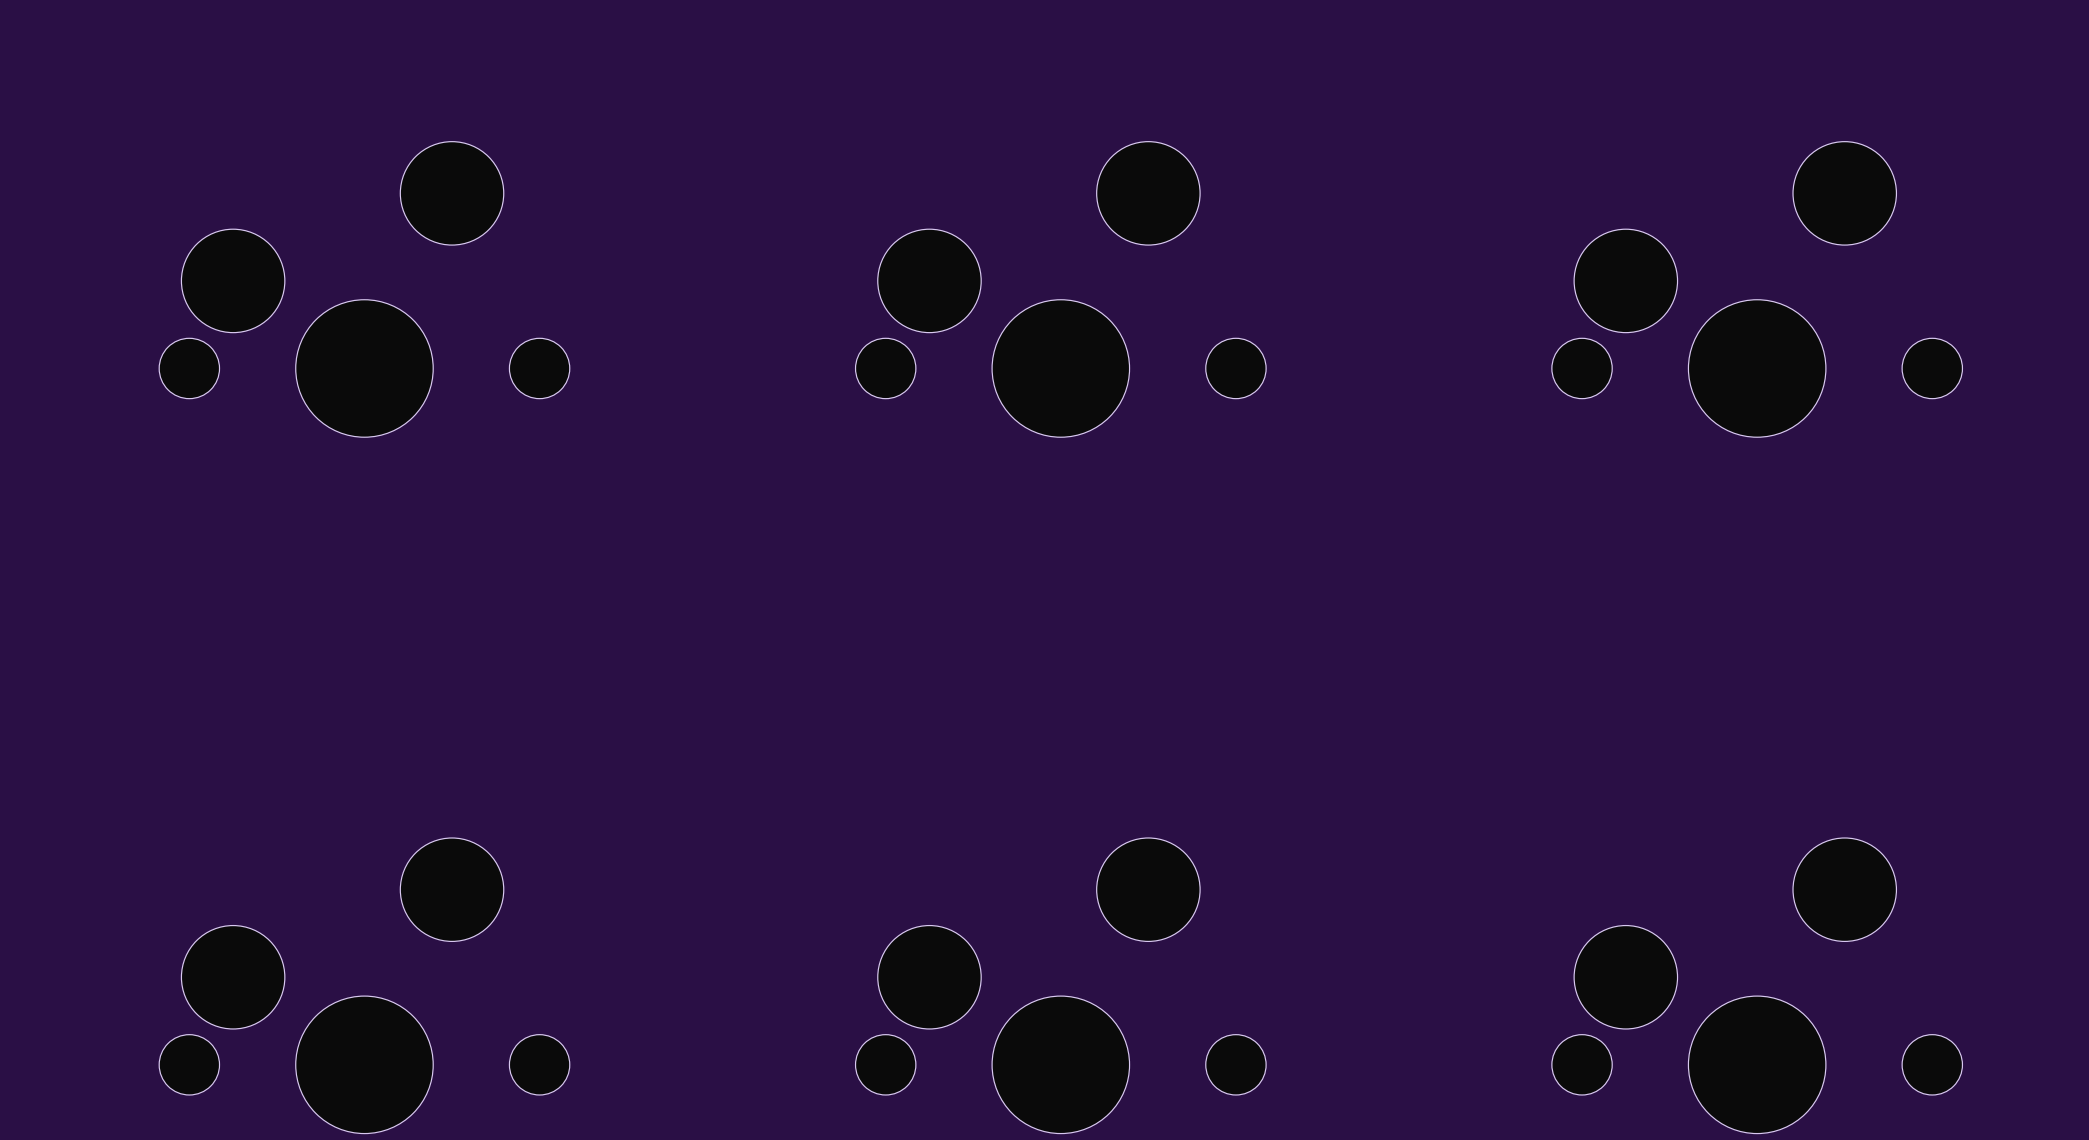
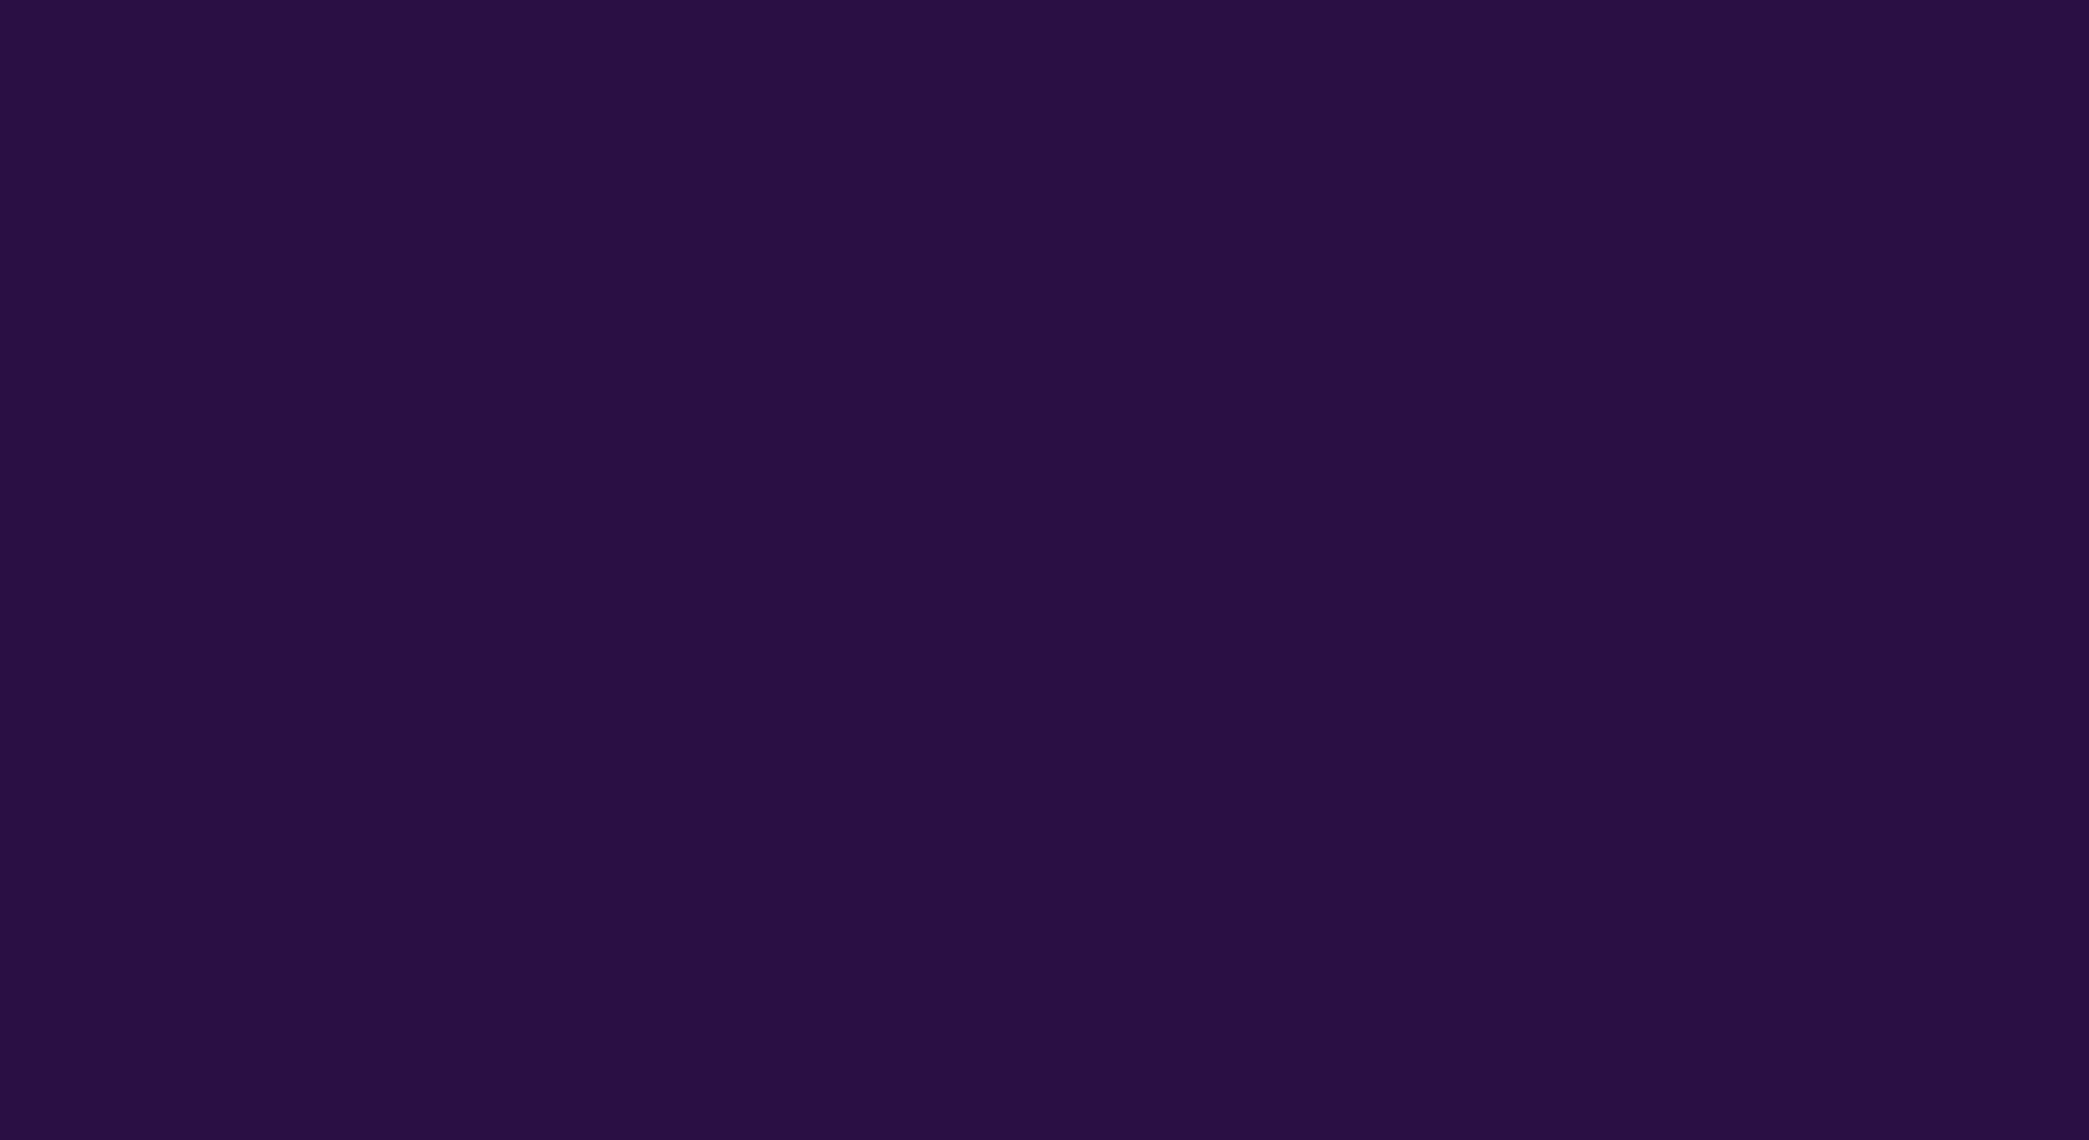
part: (364, 289) -> none
part: (1060, 289) -> none
part: (1757, 289) -> none
part: (364, 985) -> none
part: (1060, 985) -> none
part: (1757, 985) -> none

